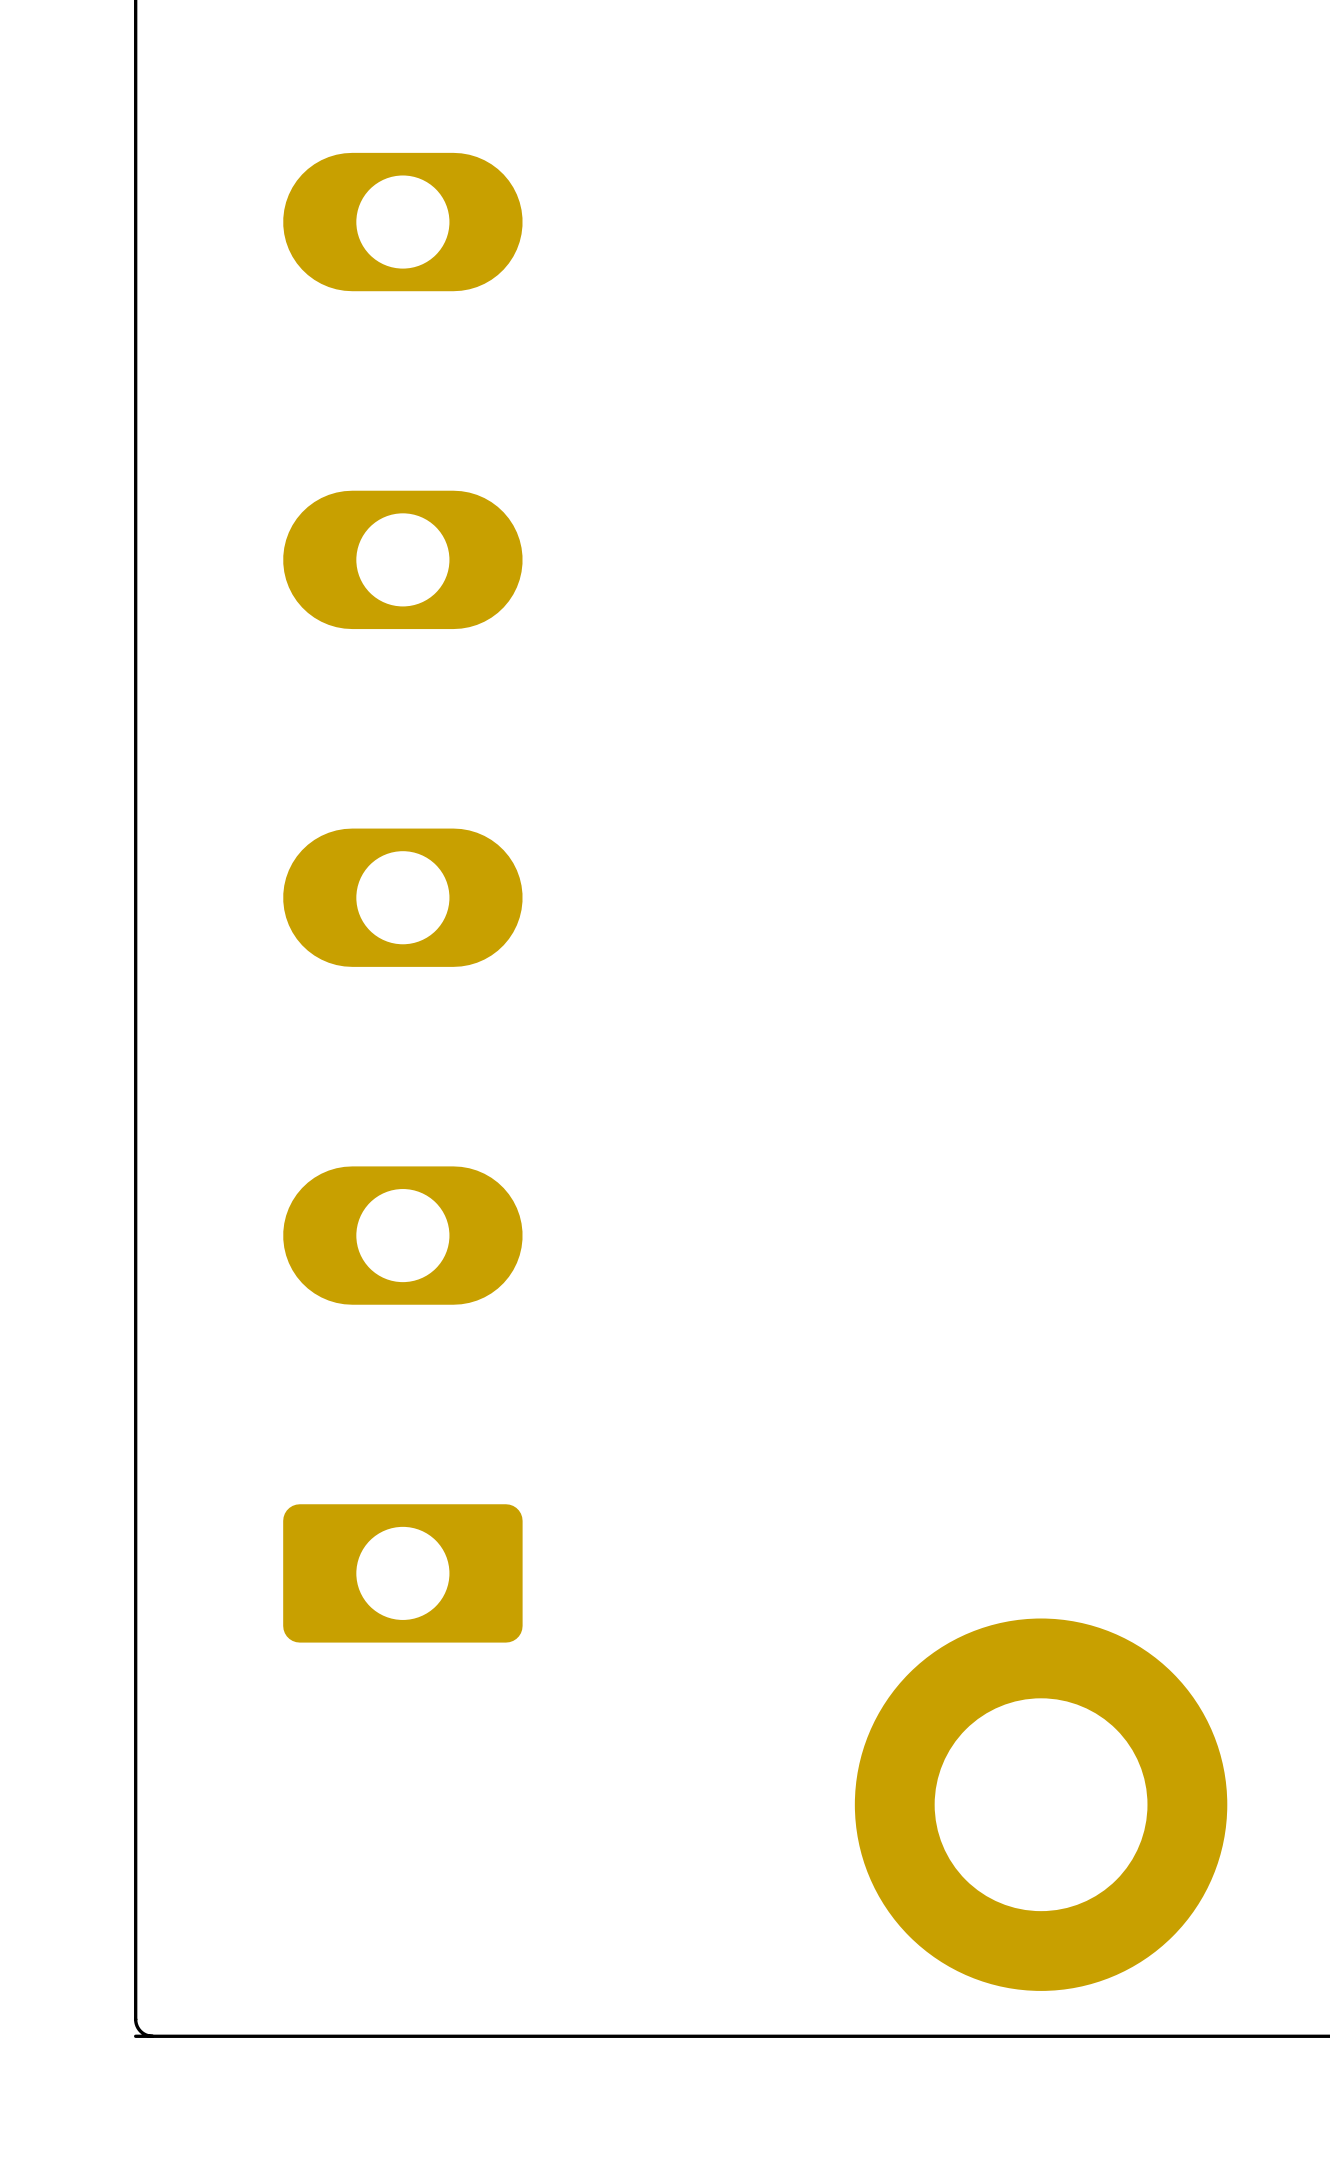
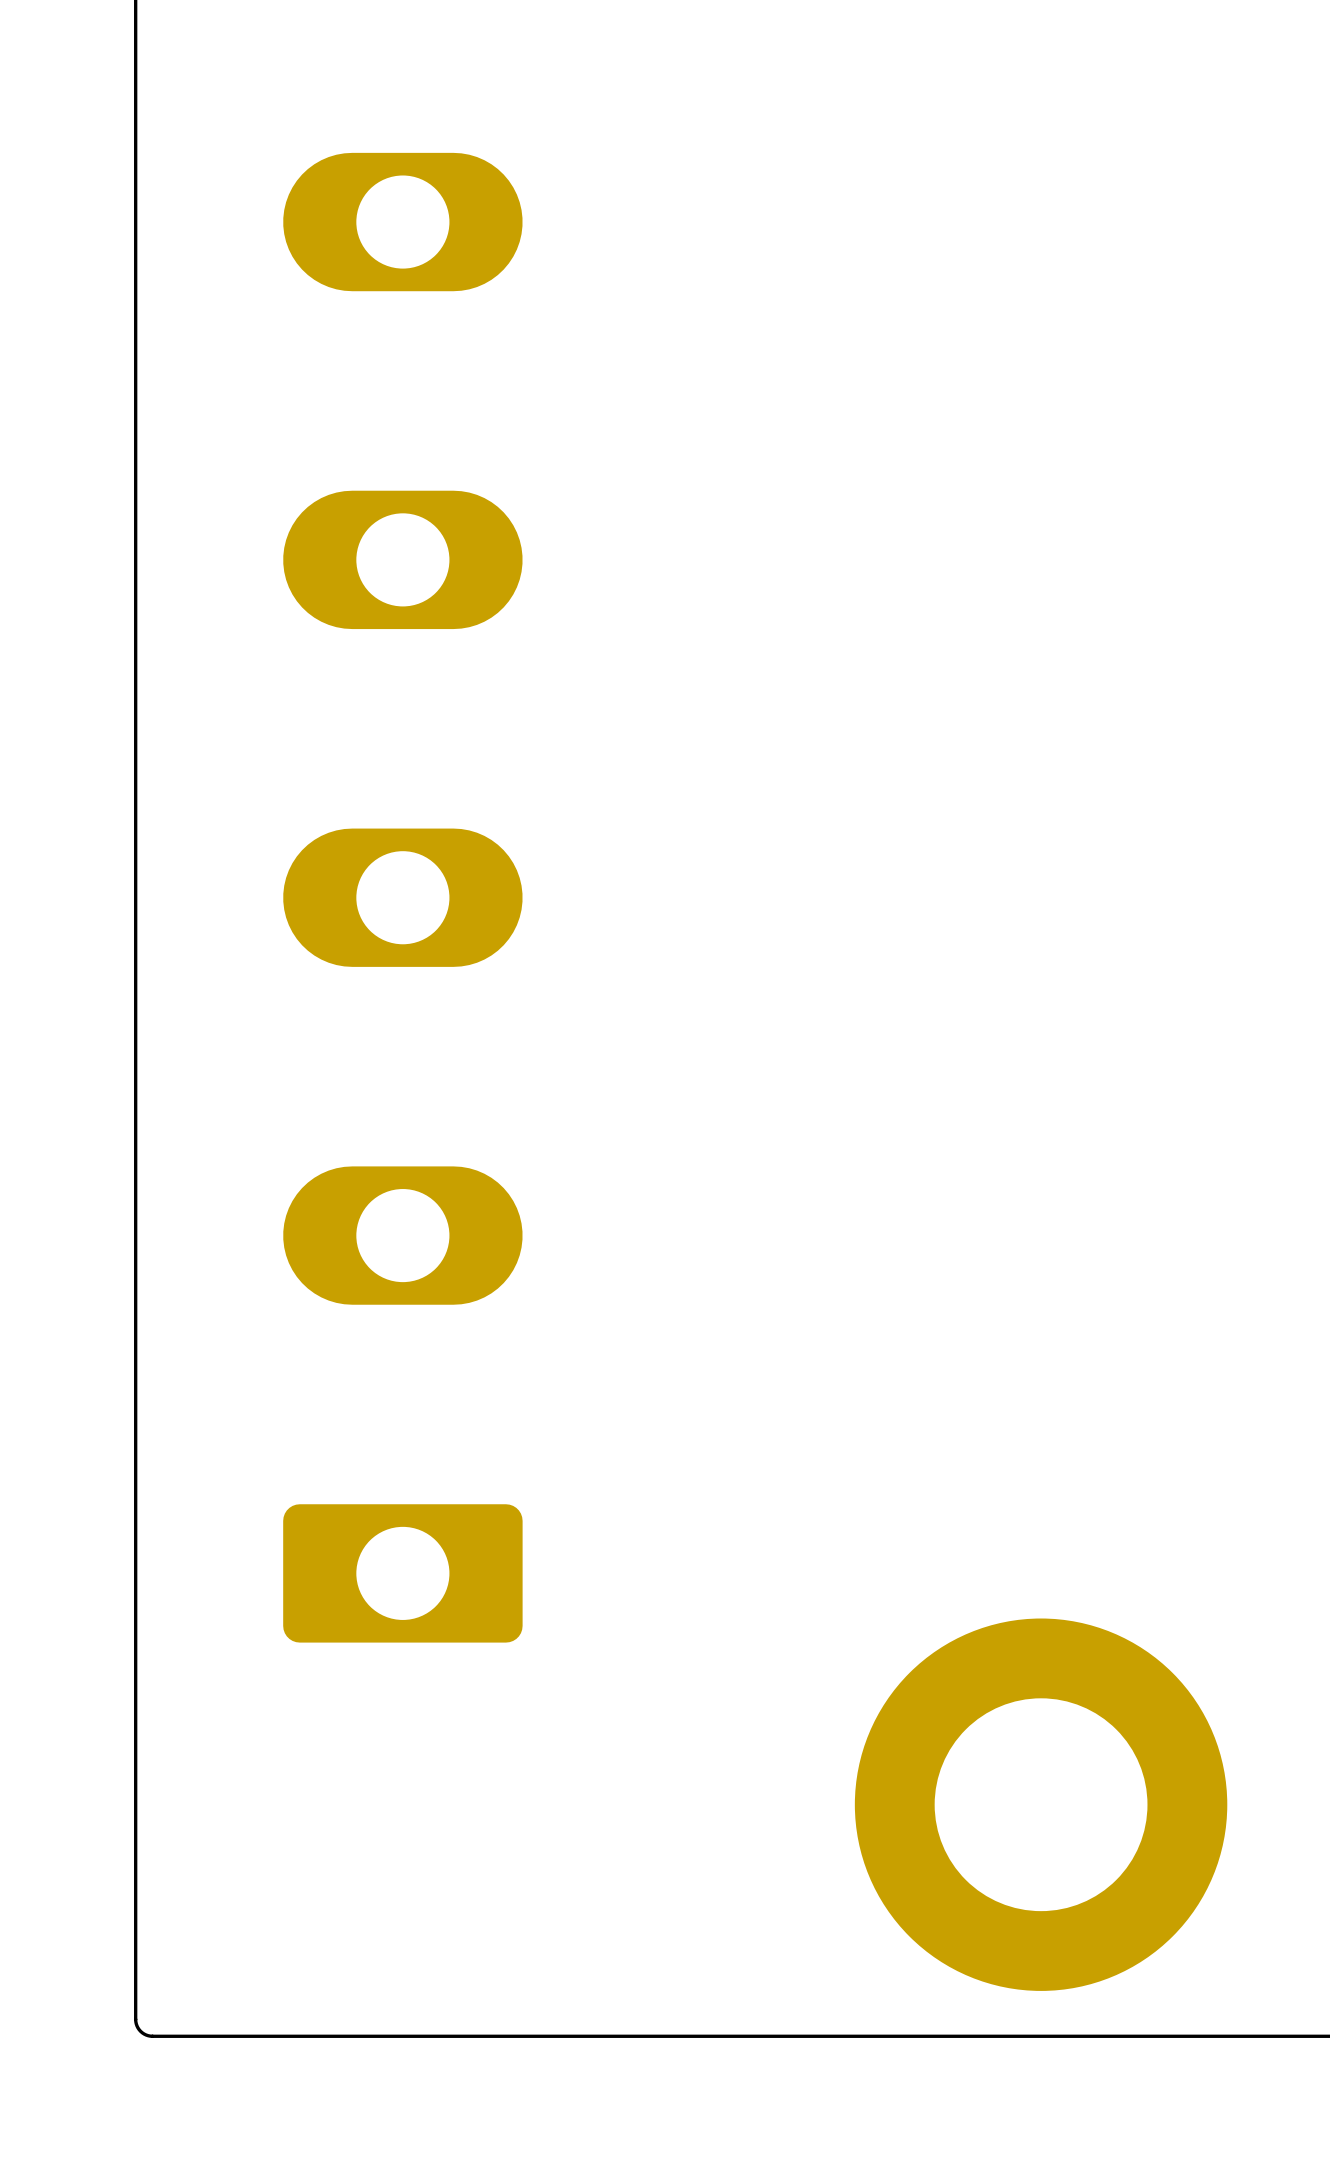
board edge: (152, 2036) (135, 2036) -> none

